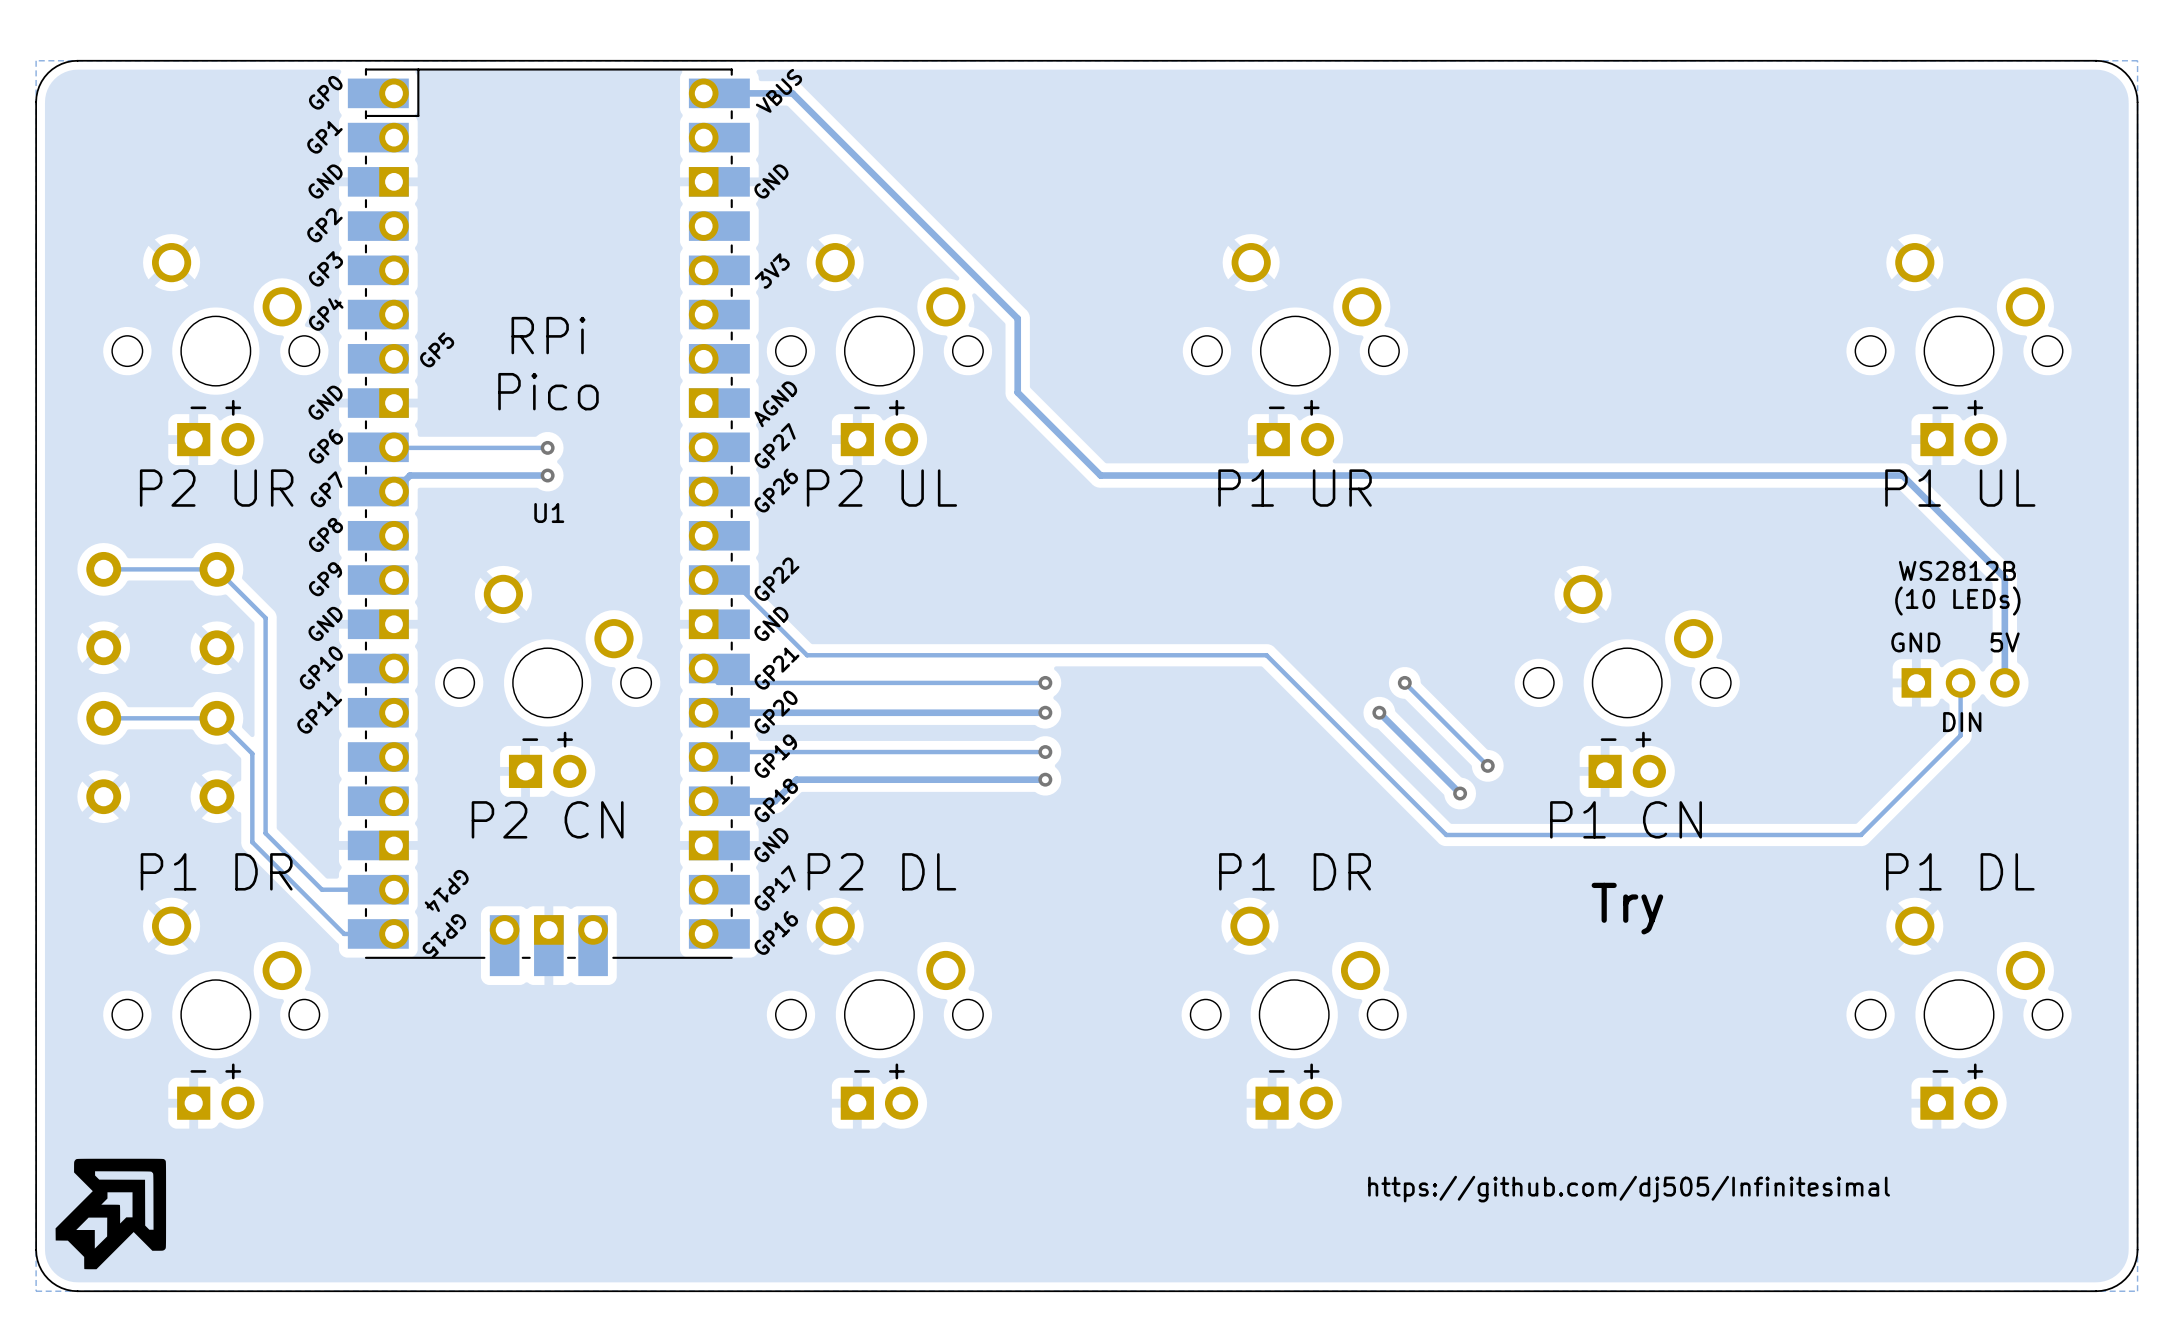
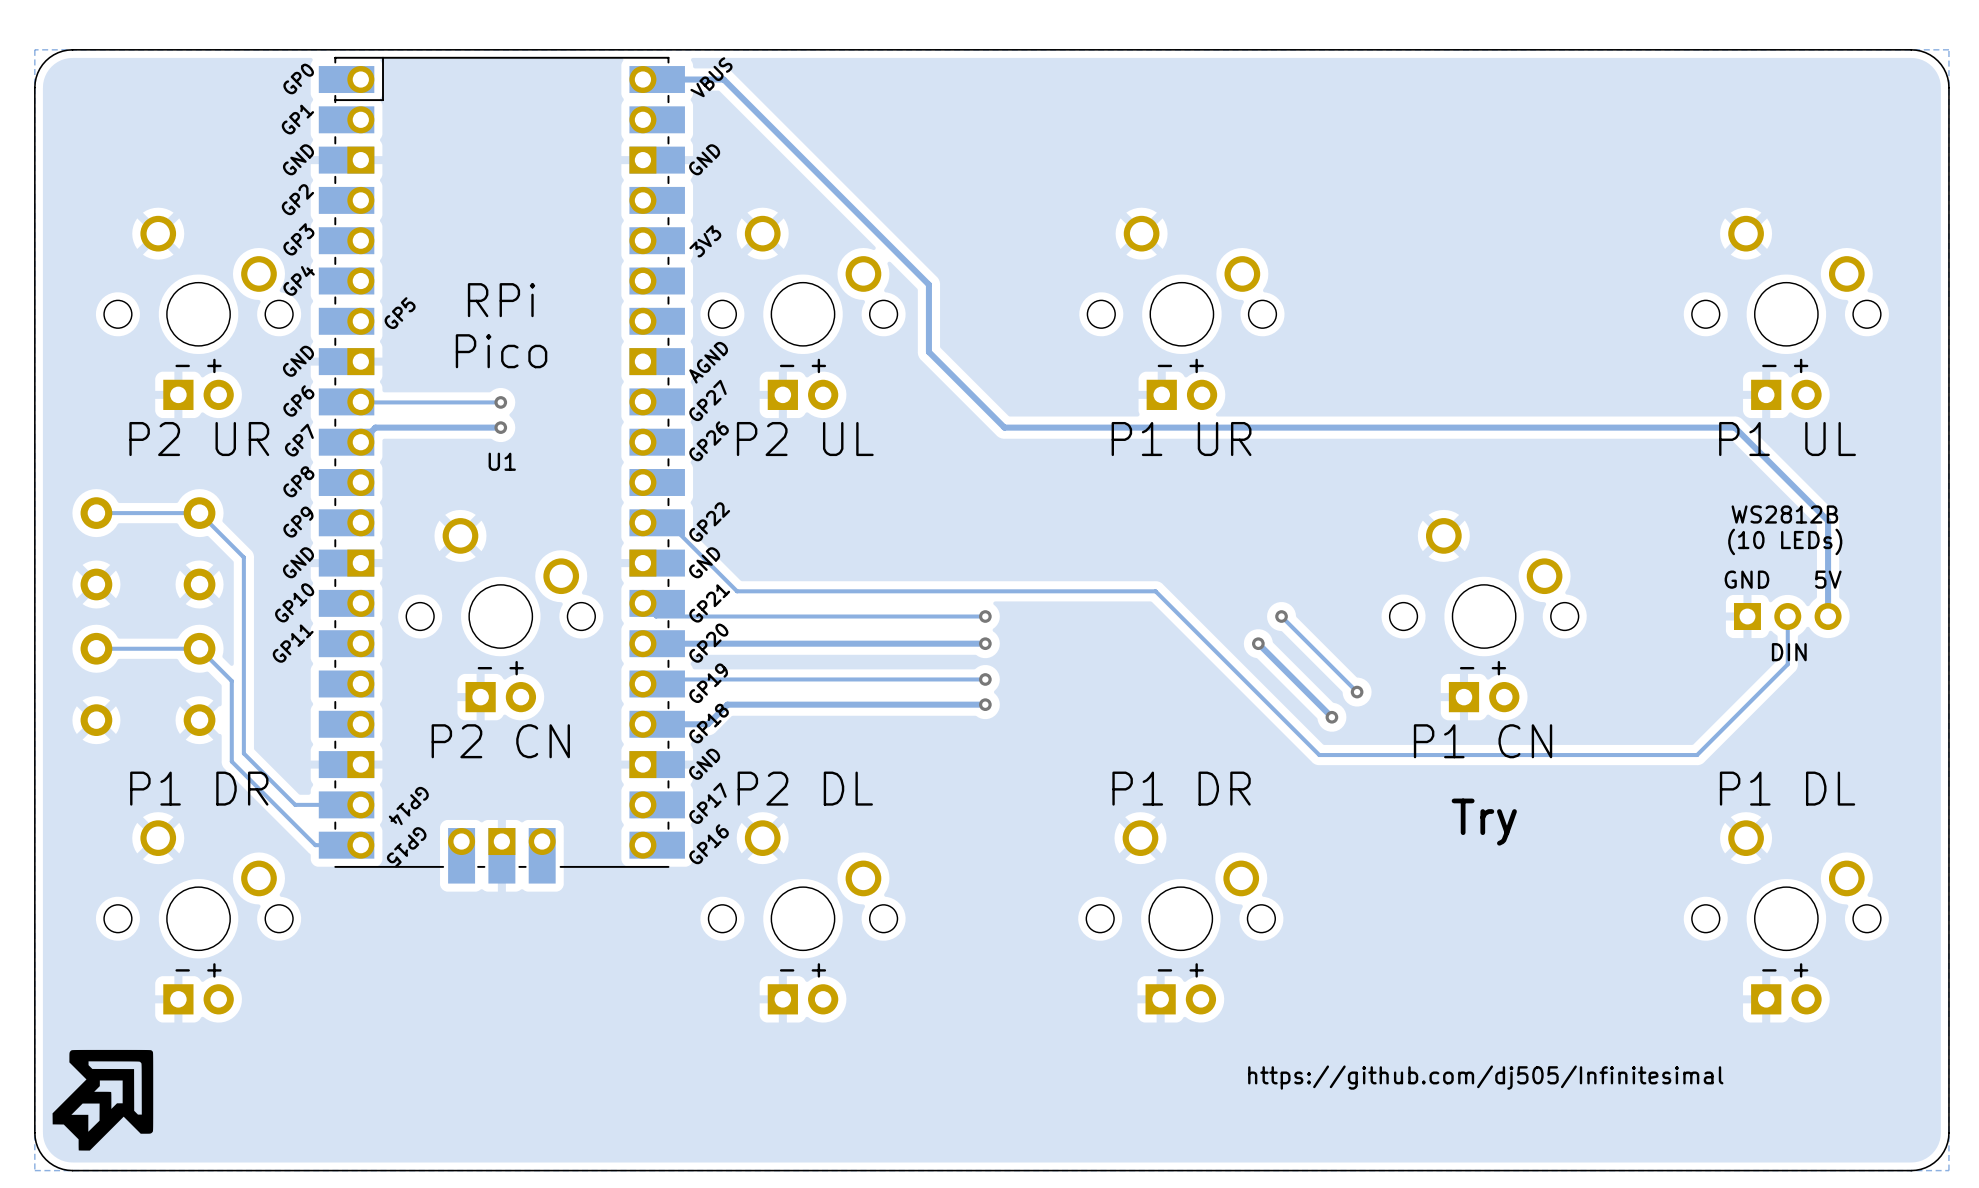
via: (1045, 682) -> none
track: none -> (985, 616) (954, 616)
via: none -> (985, 616)
via: (1045, 712) -> none
track: none -> (985, 643) (954, 643)
via: none -> (985, 643)
via: (1045, 752) -> none
track: none -> (985, 679) (954, 679)
via: none -> (985, 679)
via: (1045, 779) -> none
track: none -> (985, 704) (954, 704)
via: none -> (985, 704)

